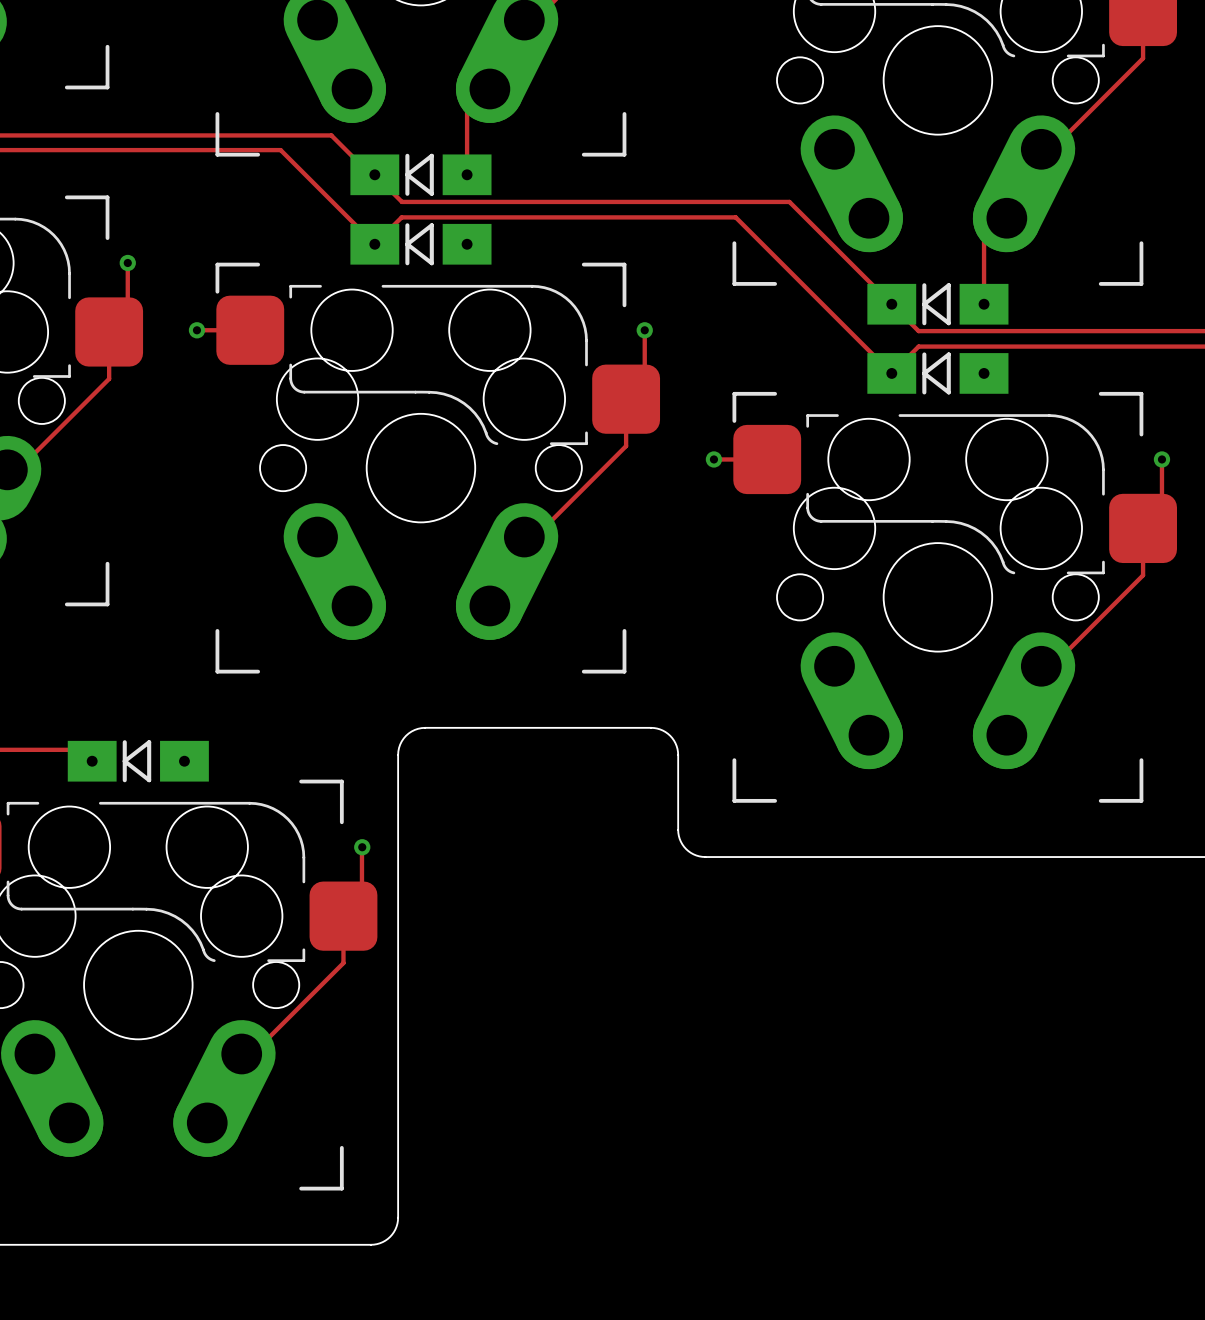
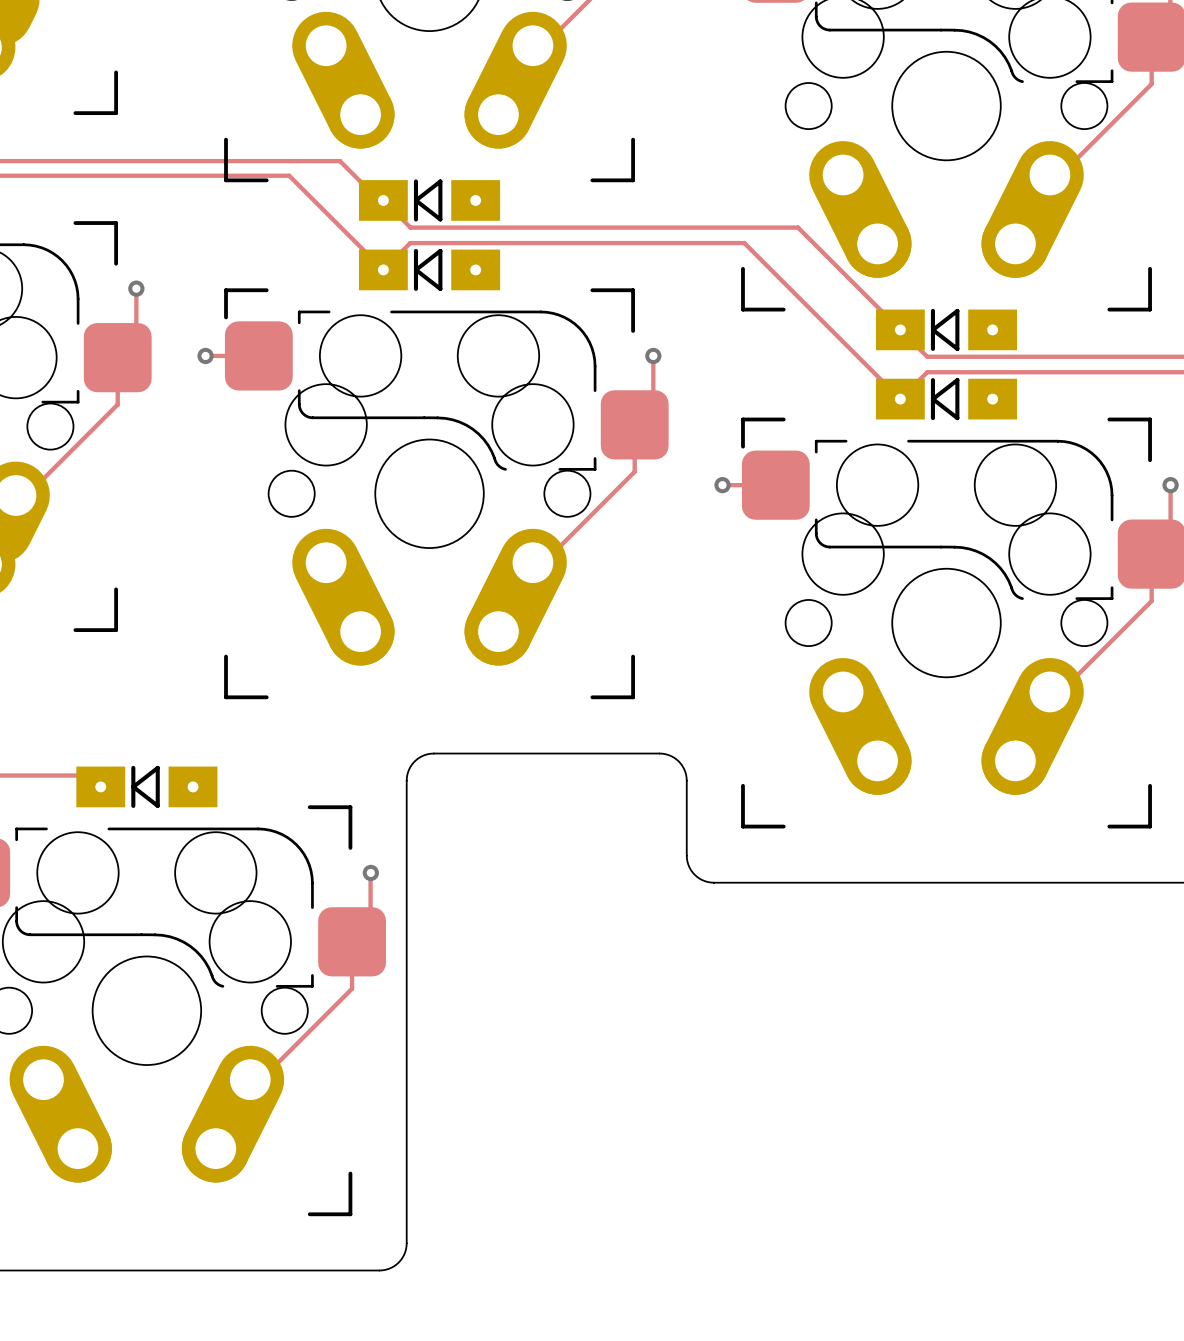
track: (489, 89) (467, 111) (467, 174) -> none
track: (1006, 218) (984, 241) (984, 304) -> none

